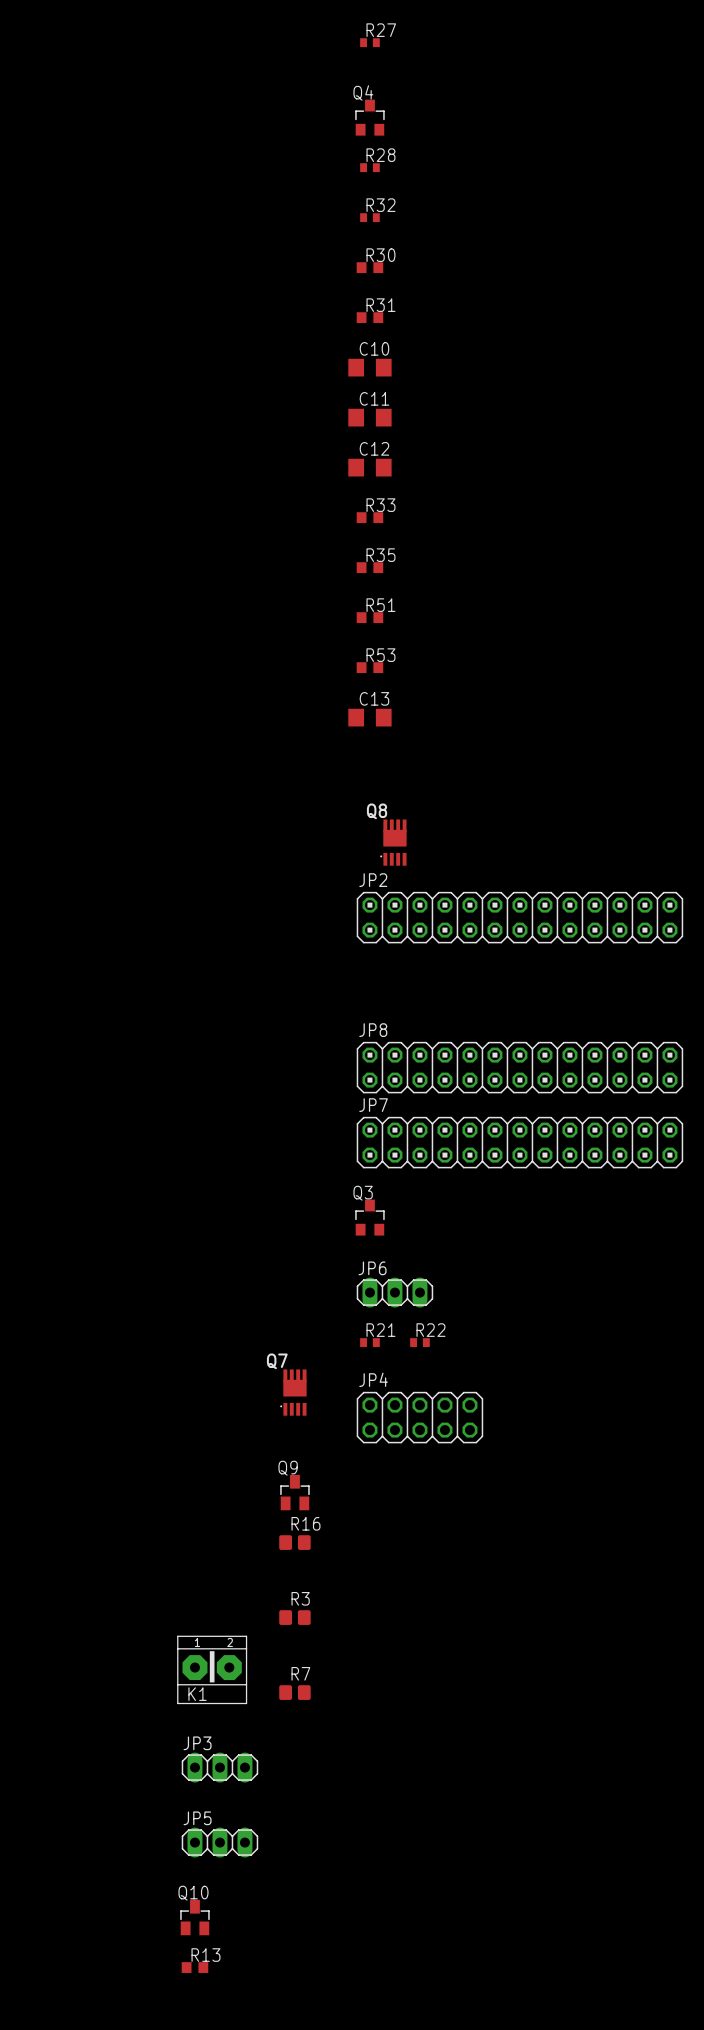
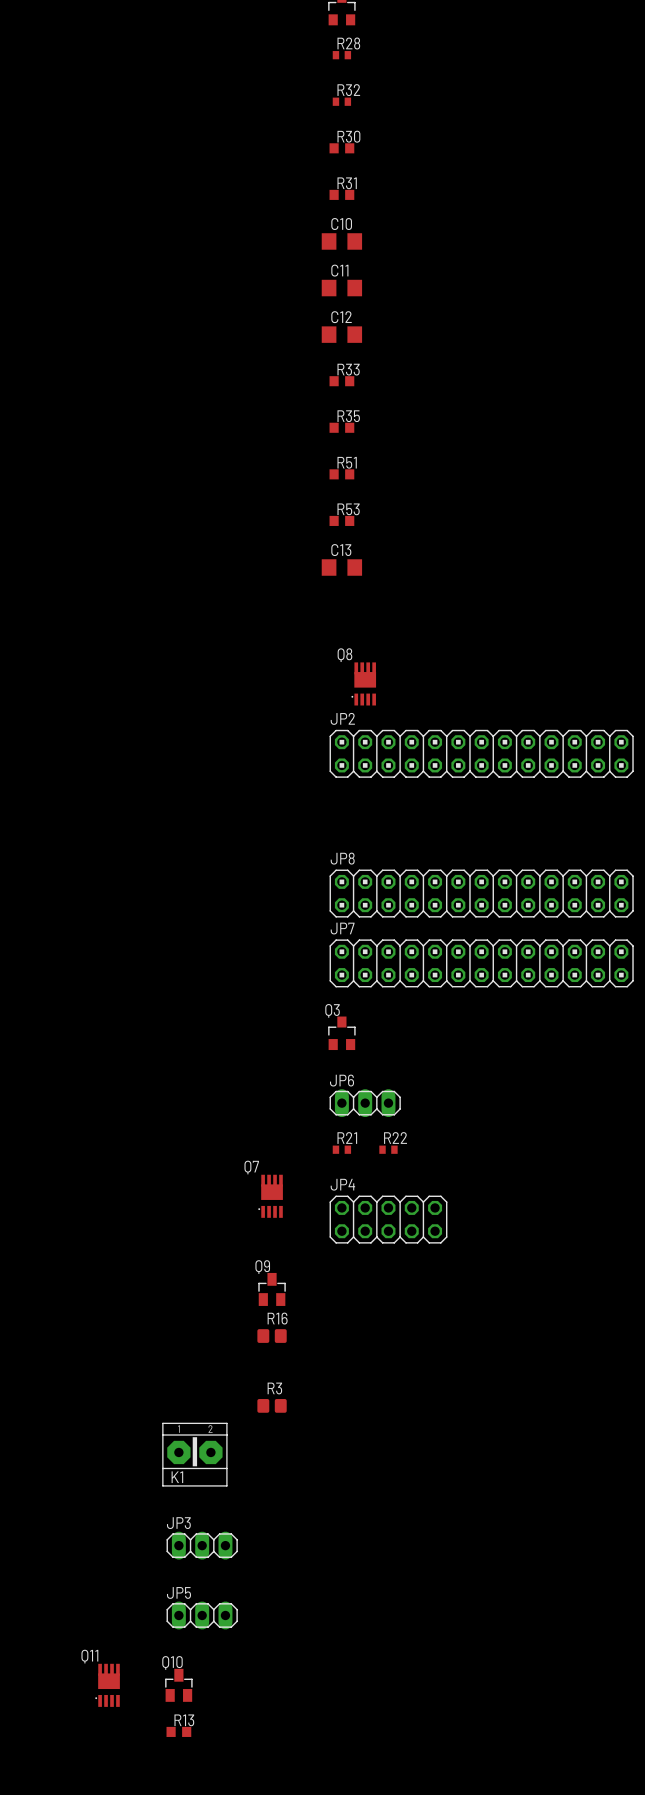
R7: (294, 1692) -> none
Q11: none -> (107, 1685)

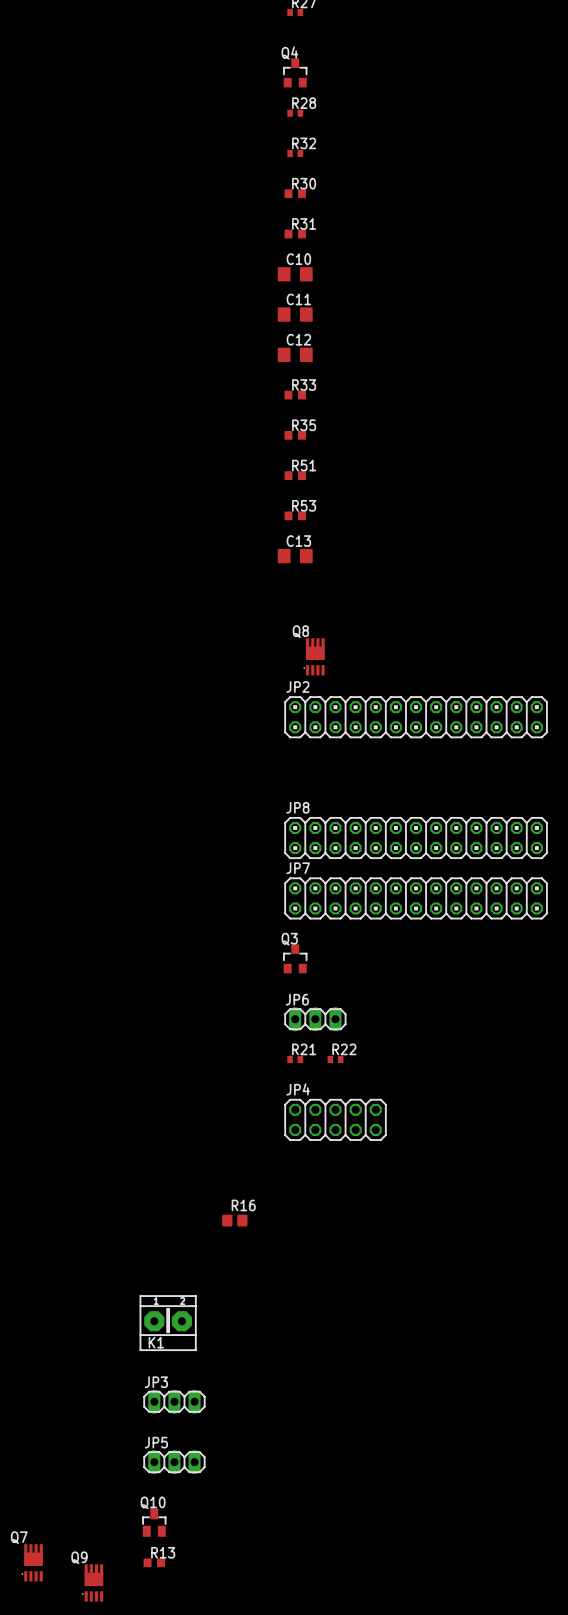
Q7 position: (270, 1196) -> (32, 1562)
Q9 footprint: [258, 1272, 286, 1306] -> [82, 1564, 104, 1602]
R3: (272, 1405) -> none
Q11: (107, 1685) -> none

